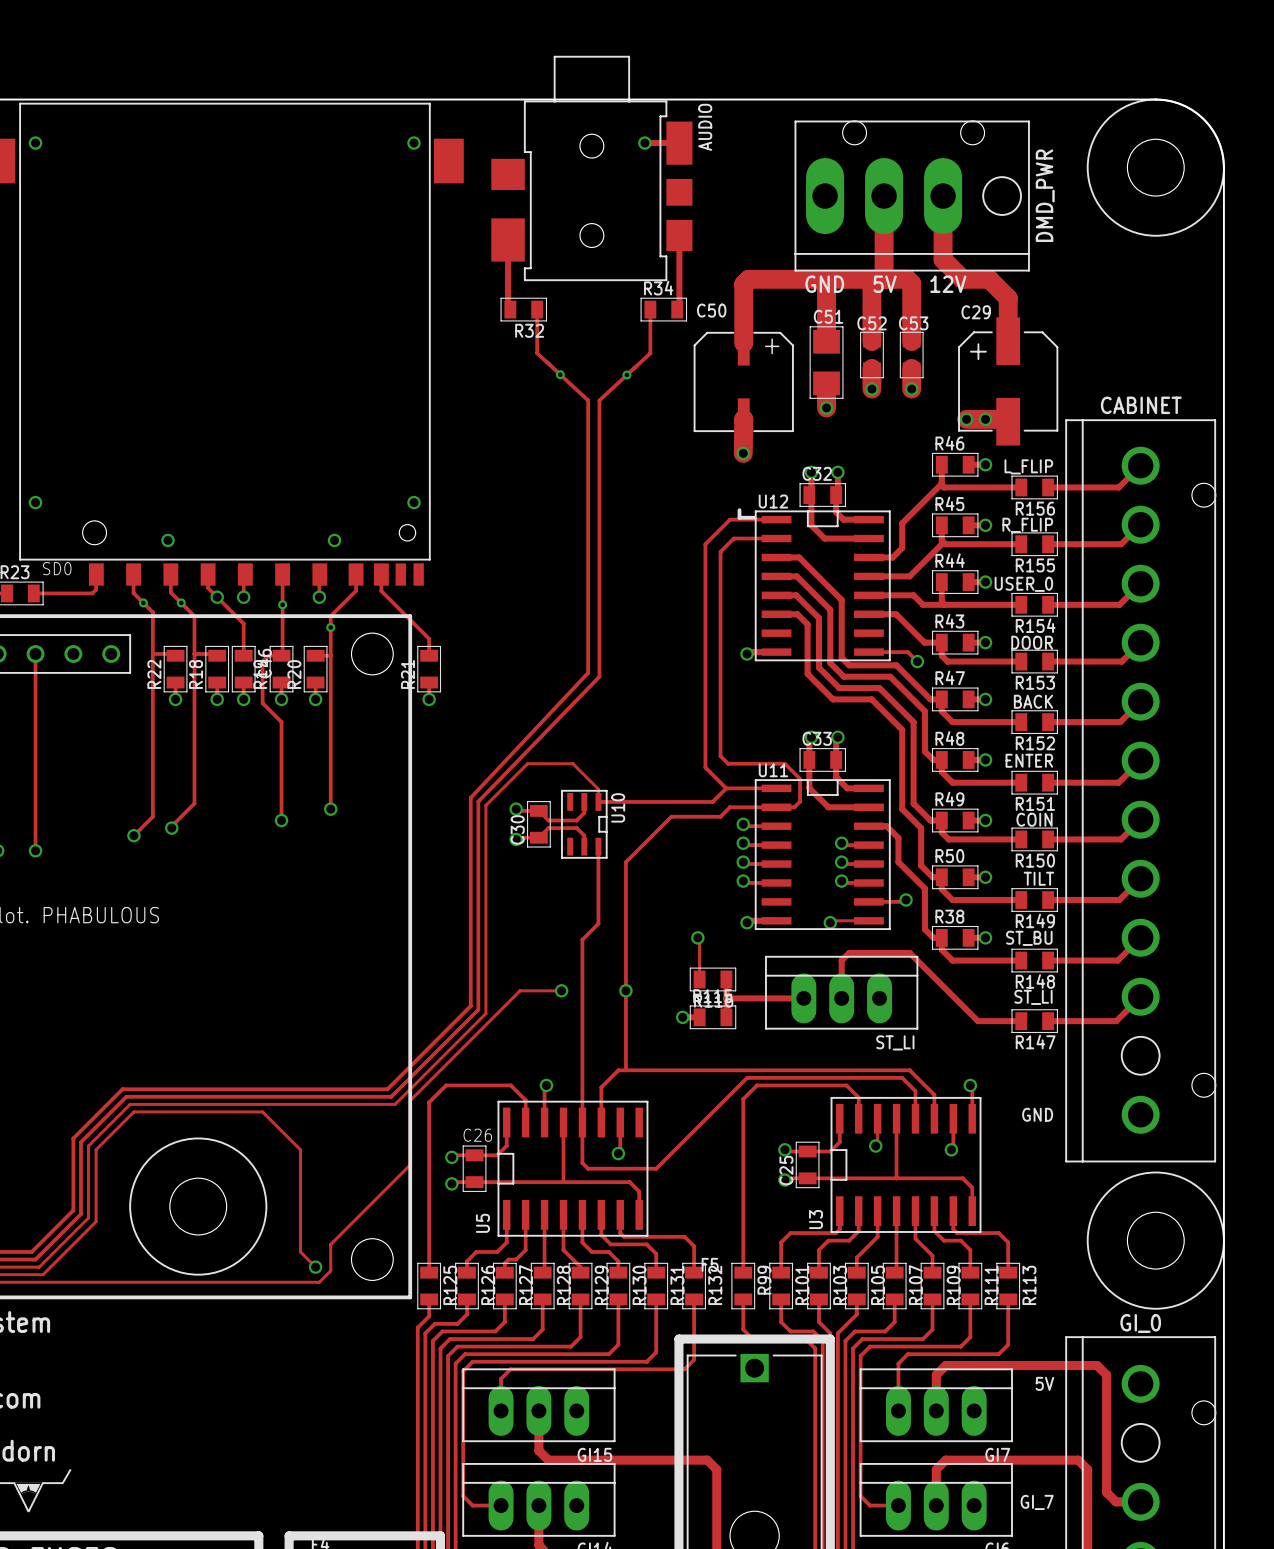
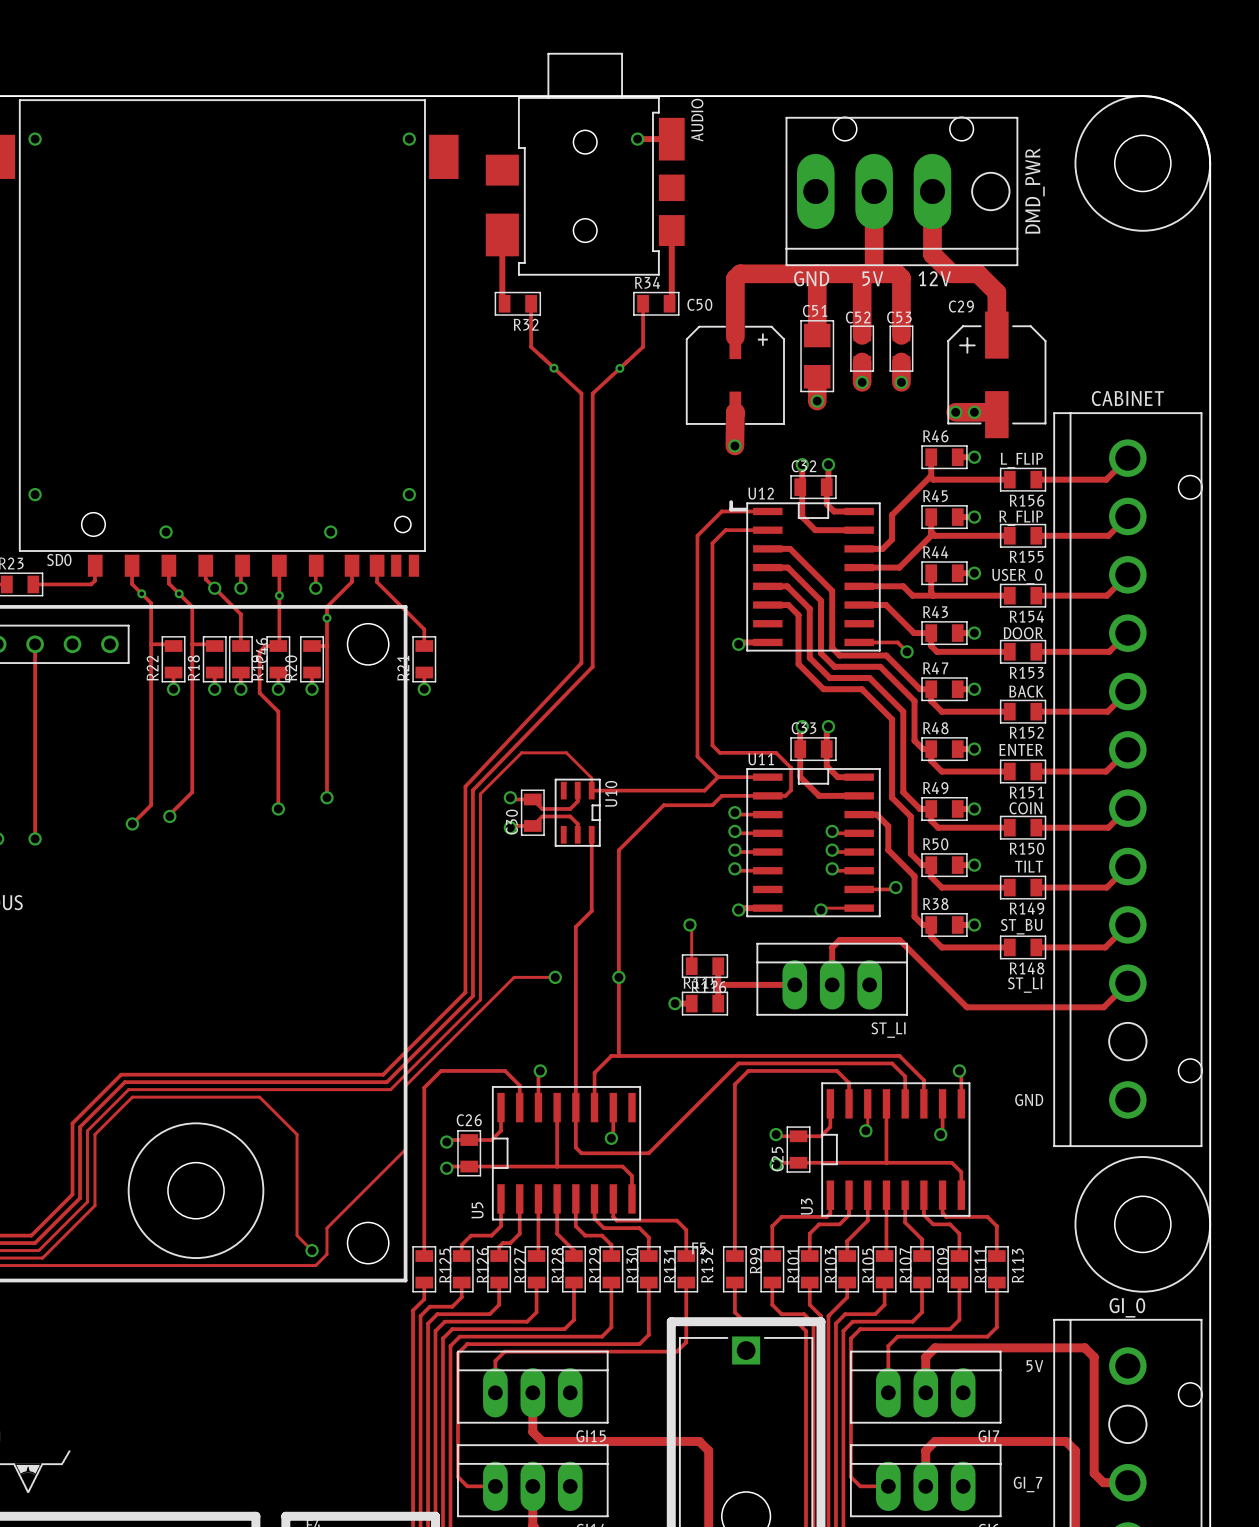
track: none -> (1009, 1007) (1036, 1007)
R147: (1034, 1021) -> none

